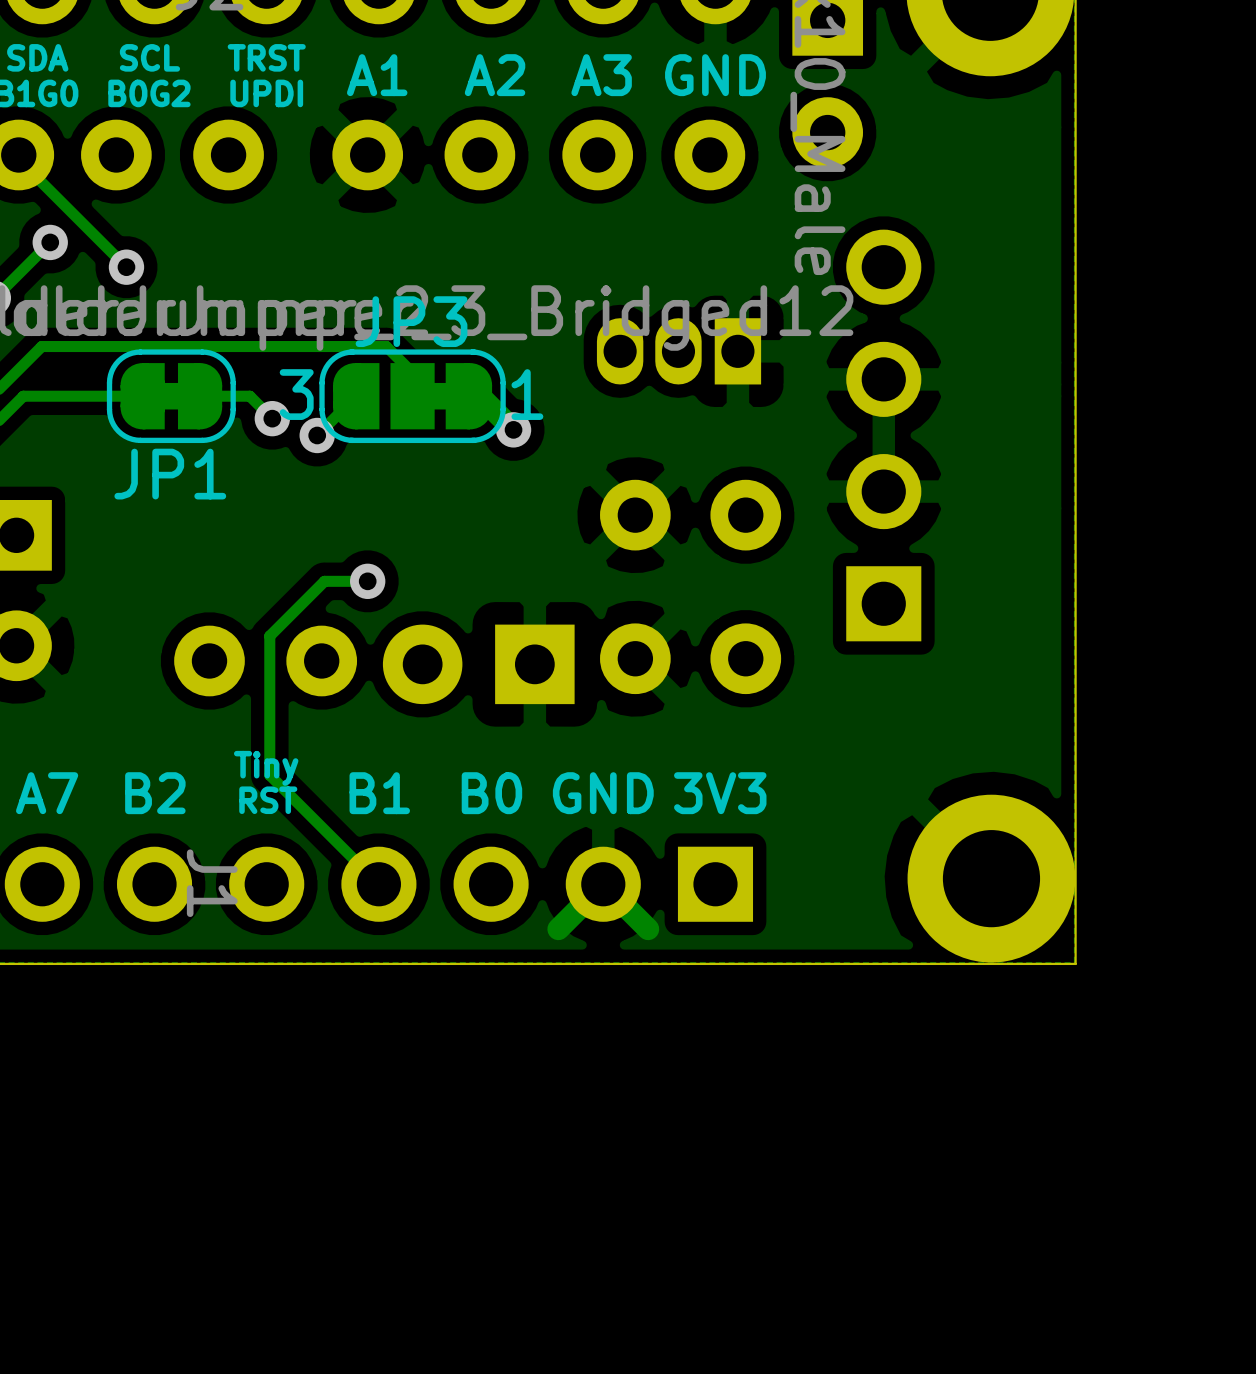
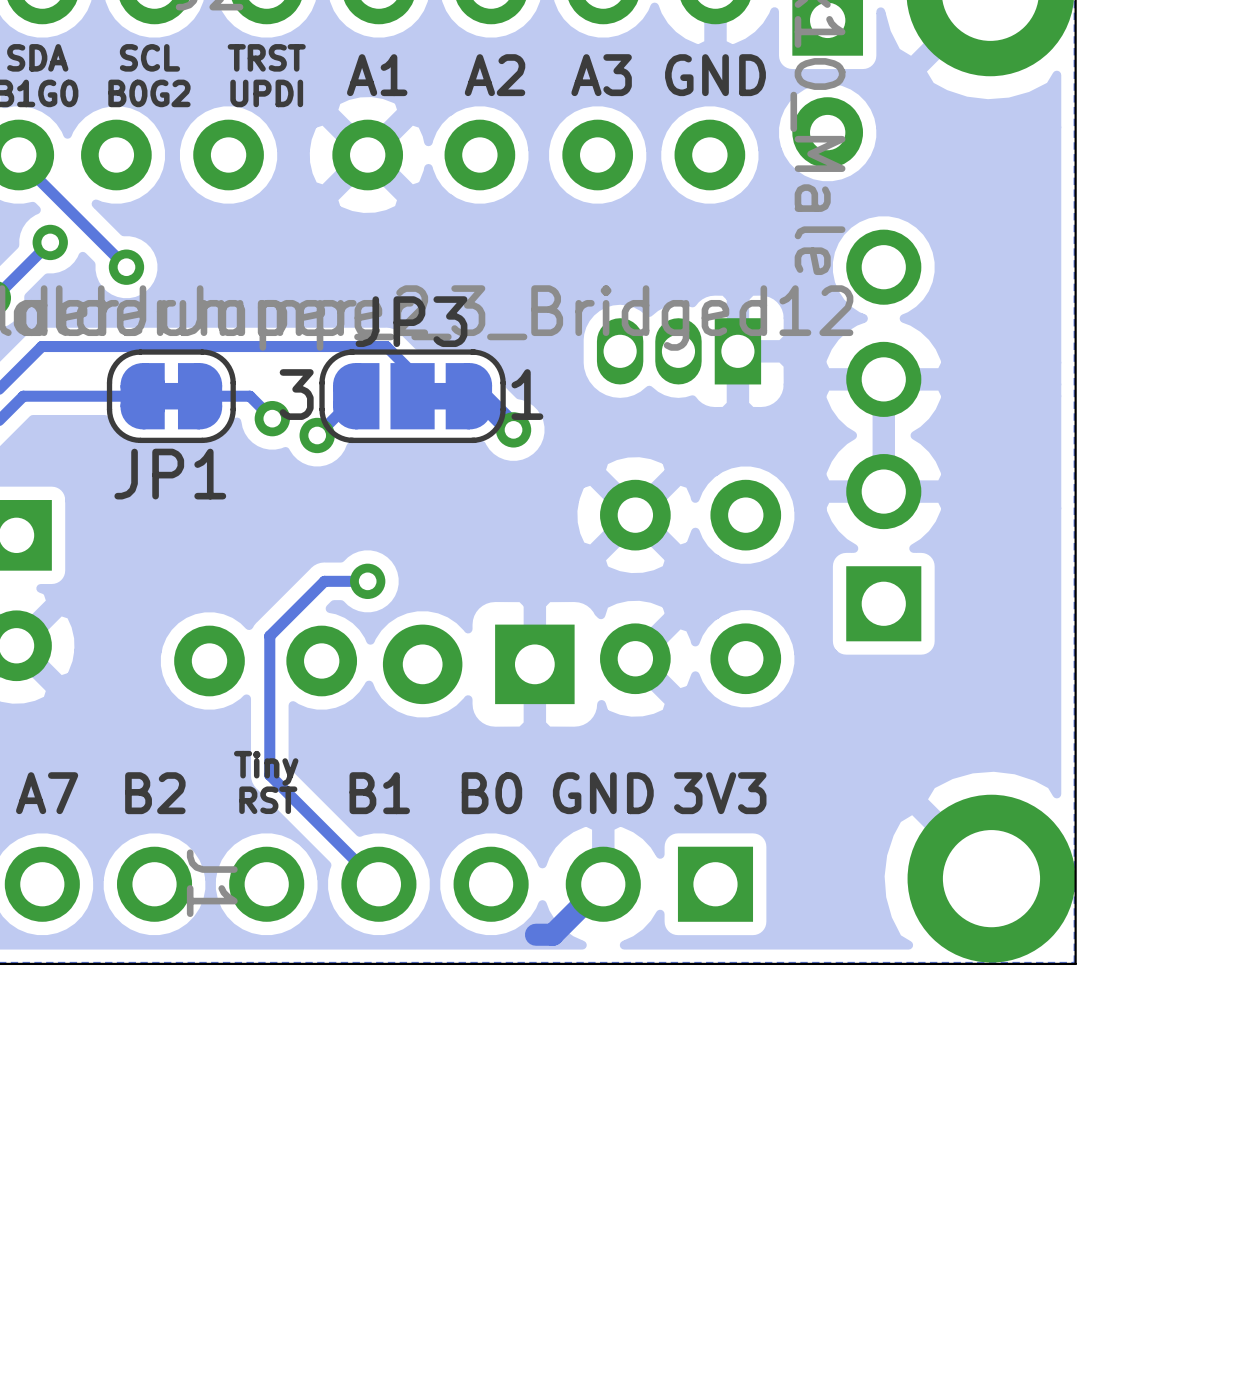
track: (603, 884) (648, 929) -> none
track: none -> (558, 929) (552, 934) (535, 934)

